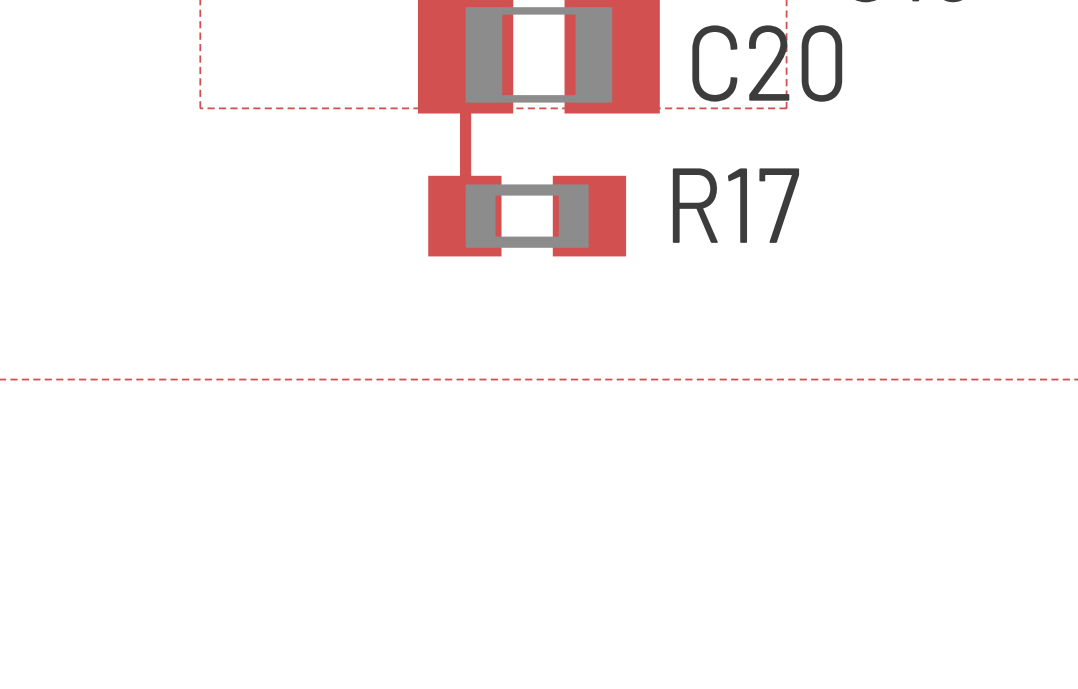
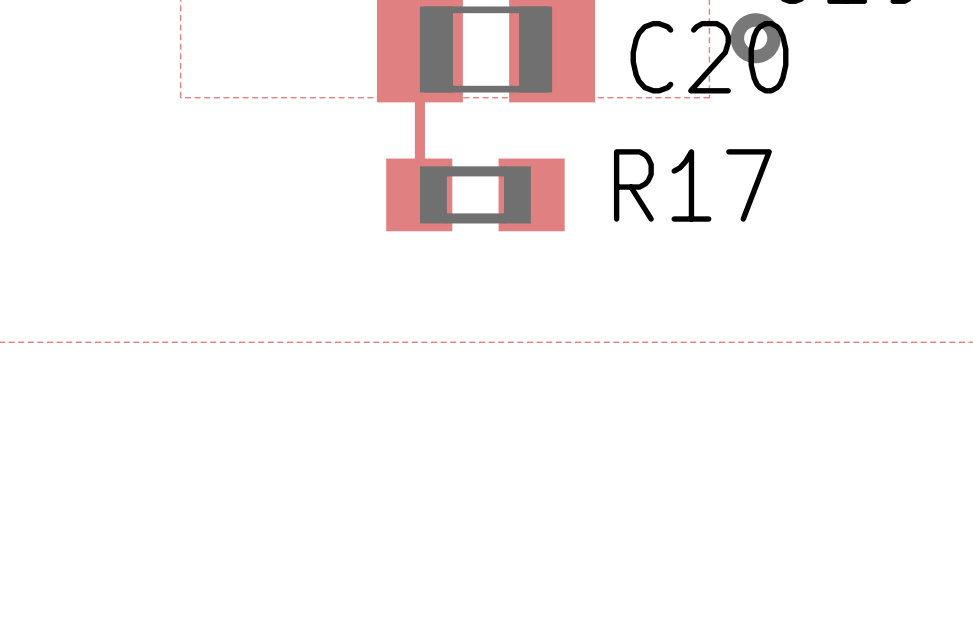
via: none -> (755, 38)

